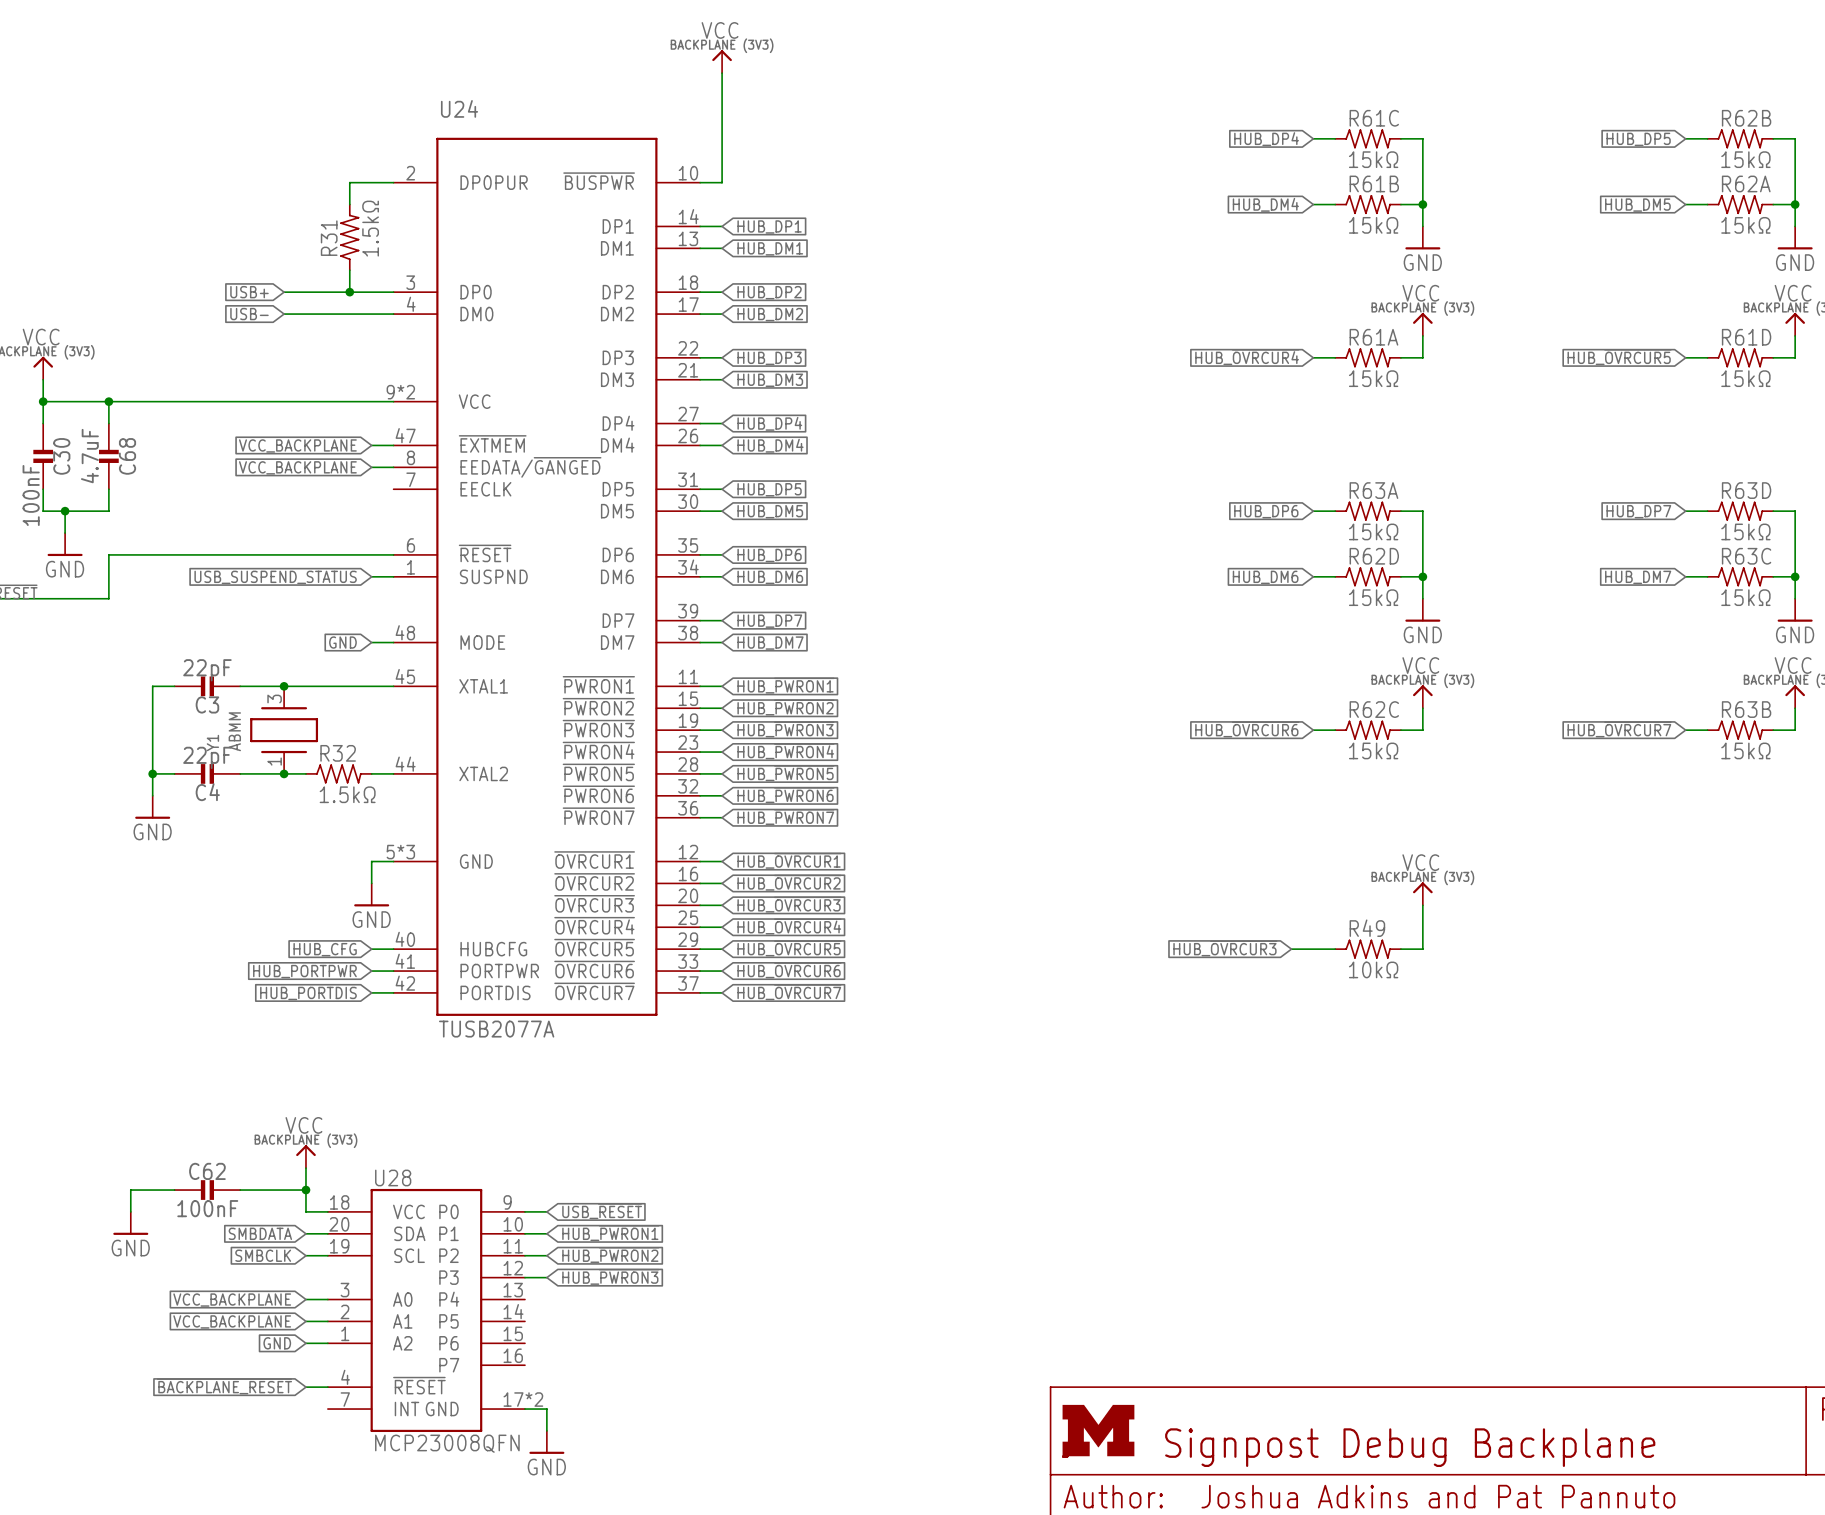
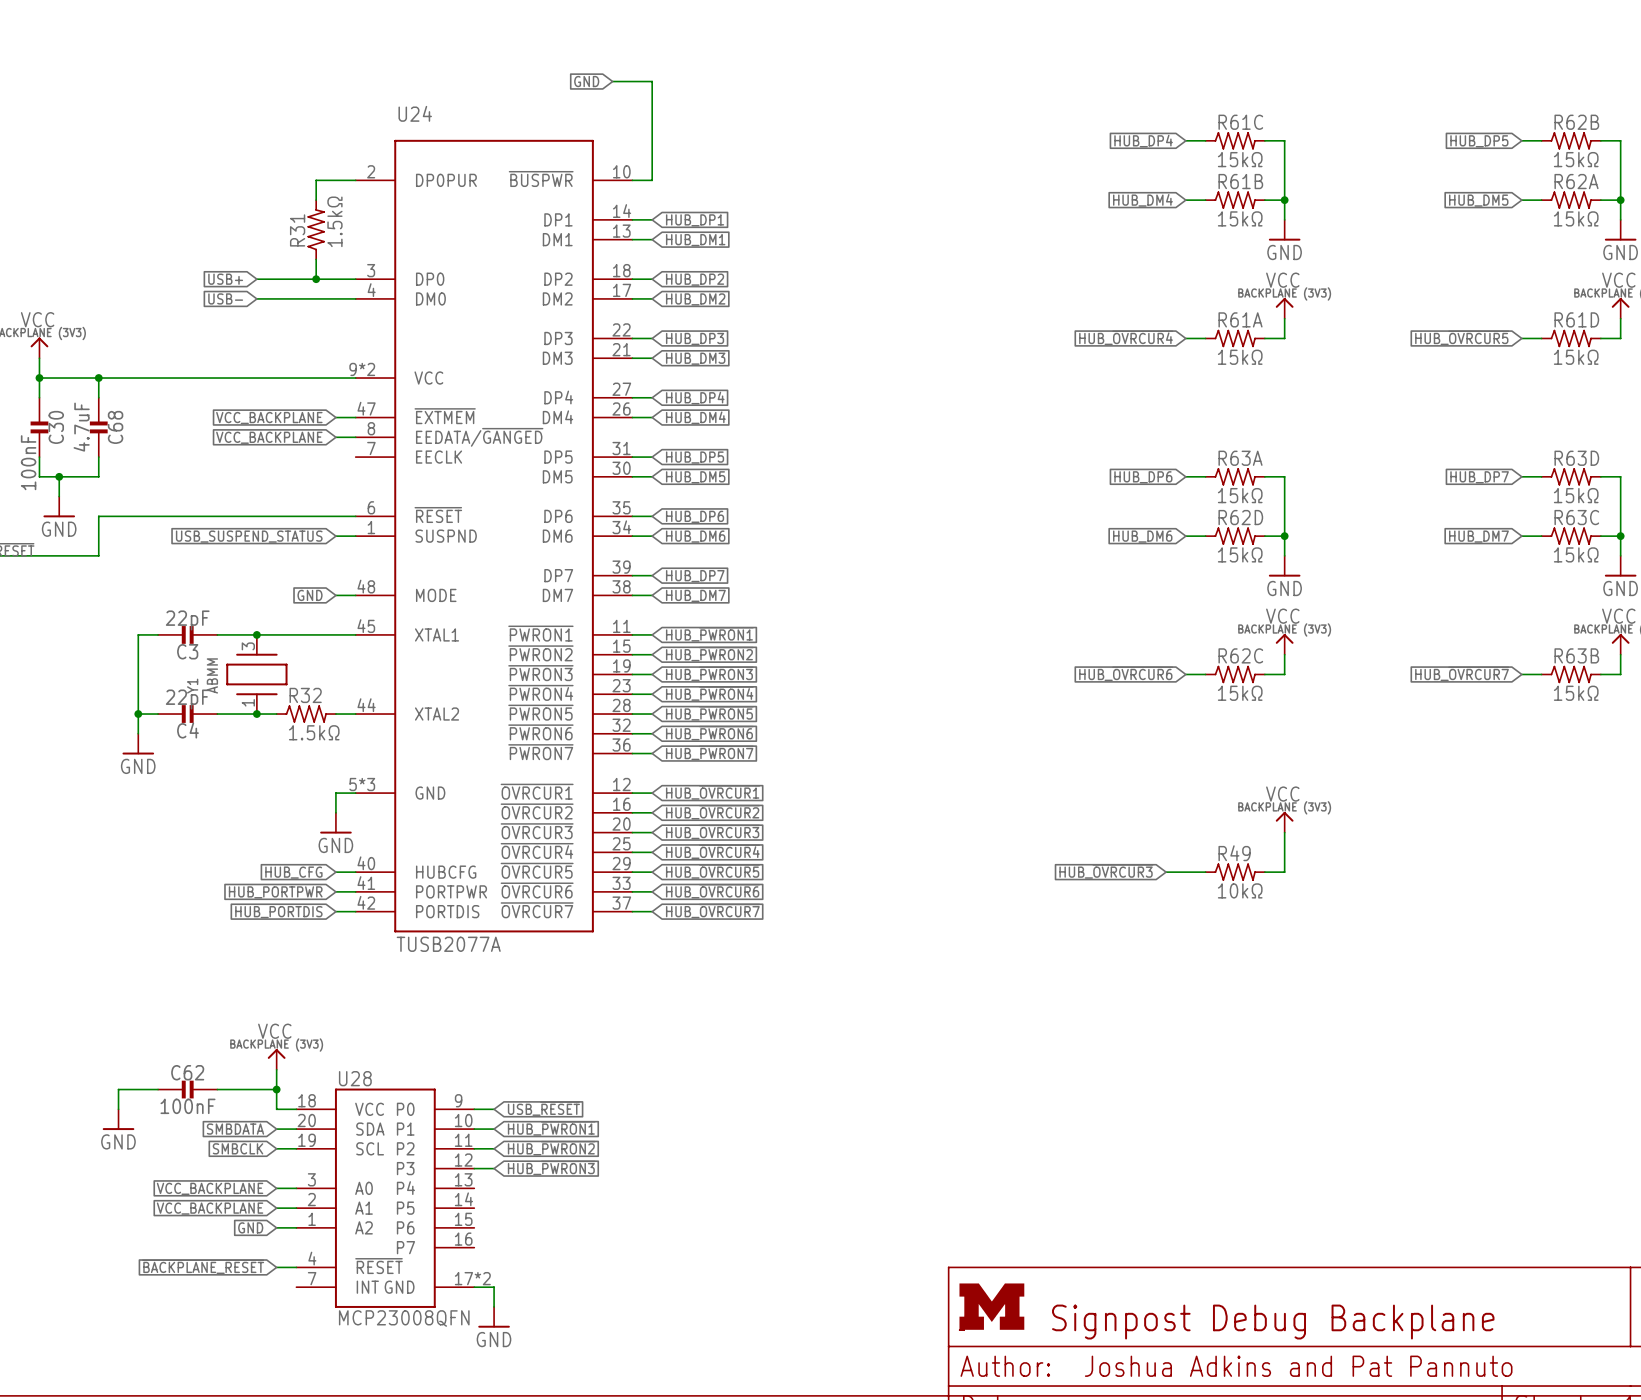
power symbol: (722, 61) -> none
global label: none -> GND (586, 81)
wire: none -> (612, 81) (652, 81)

